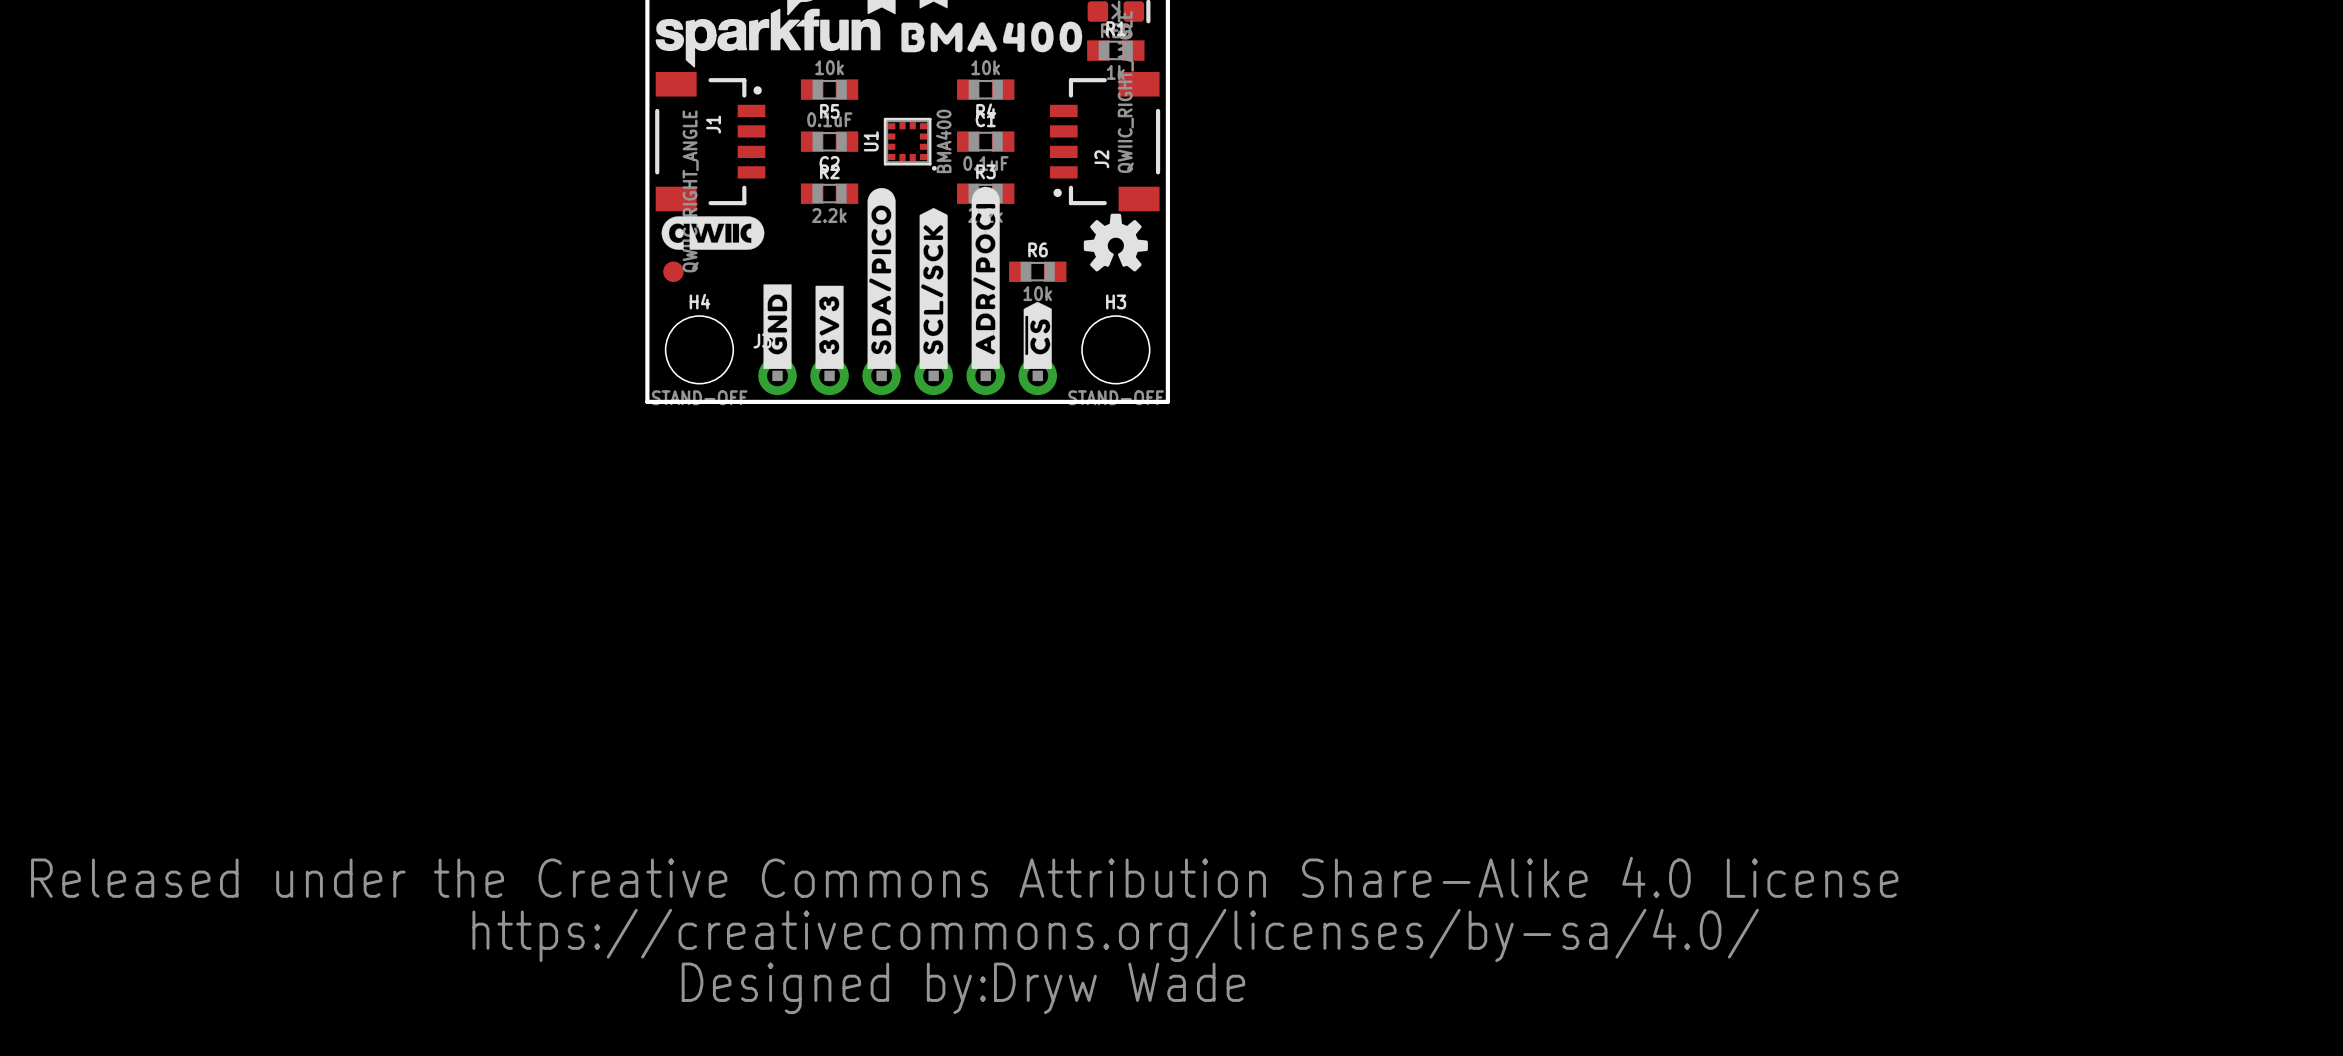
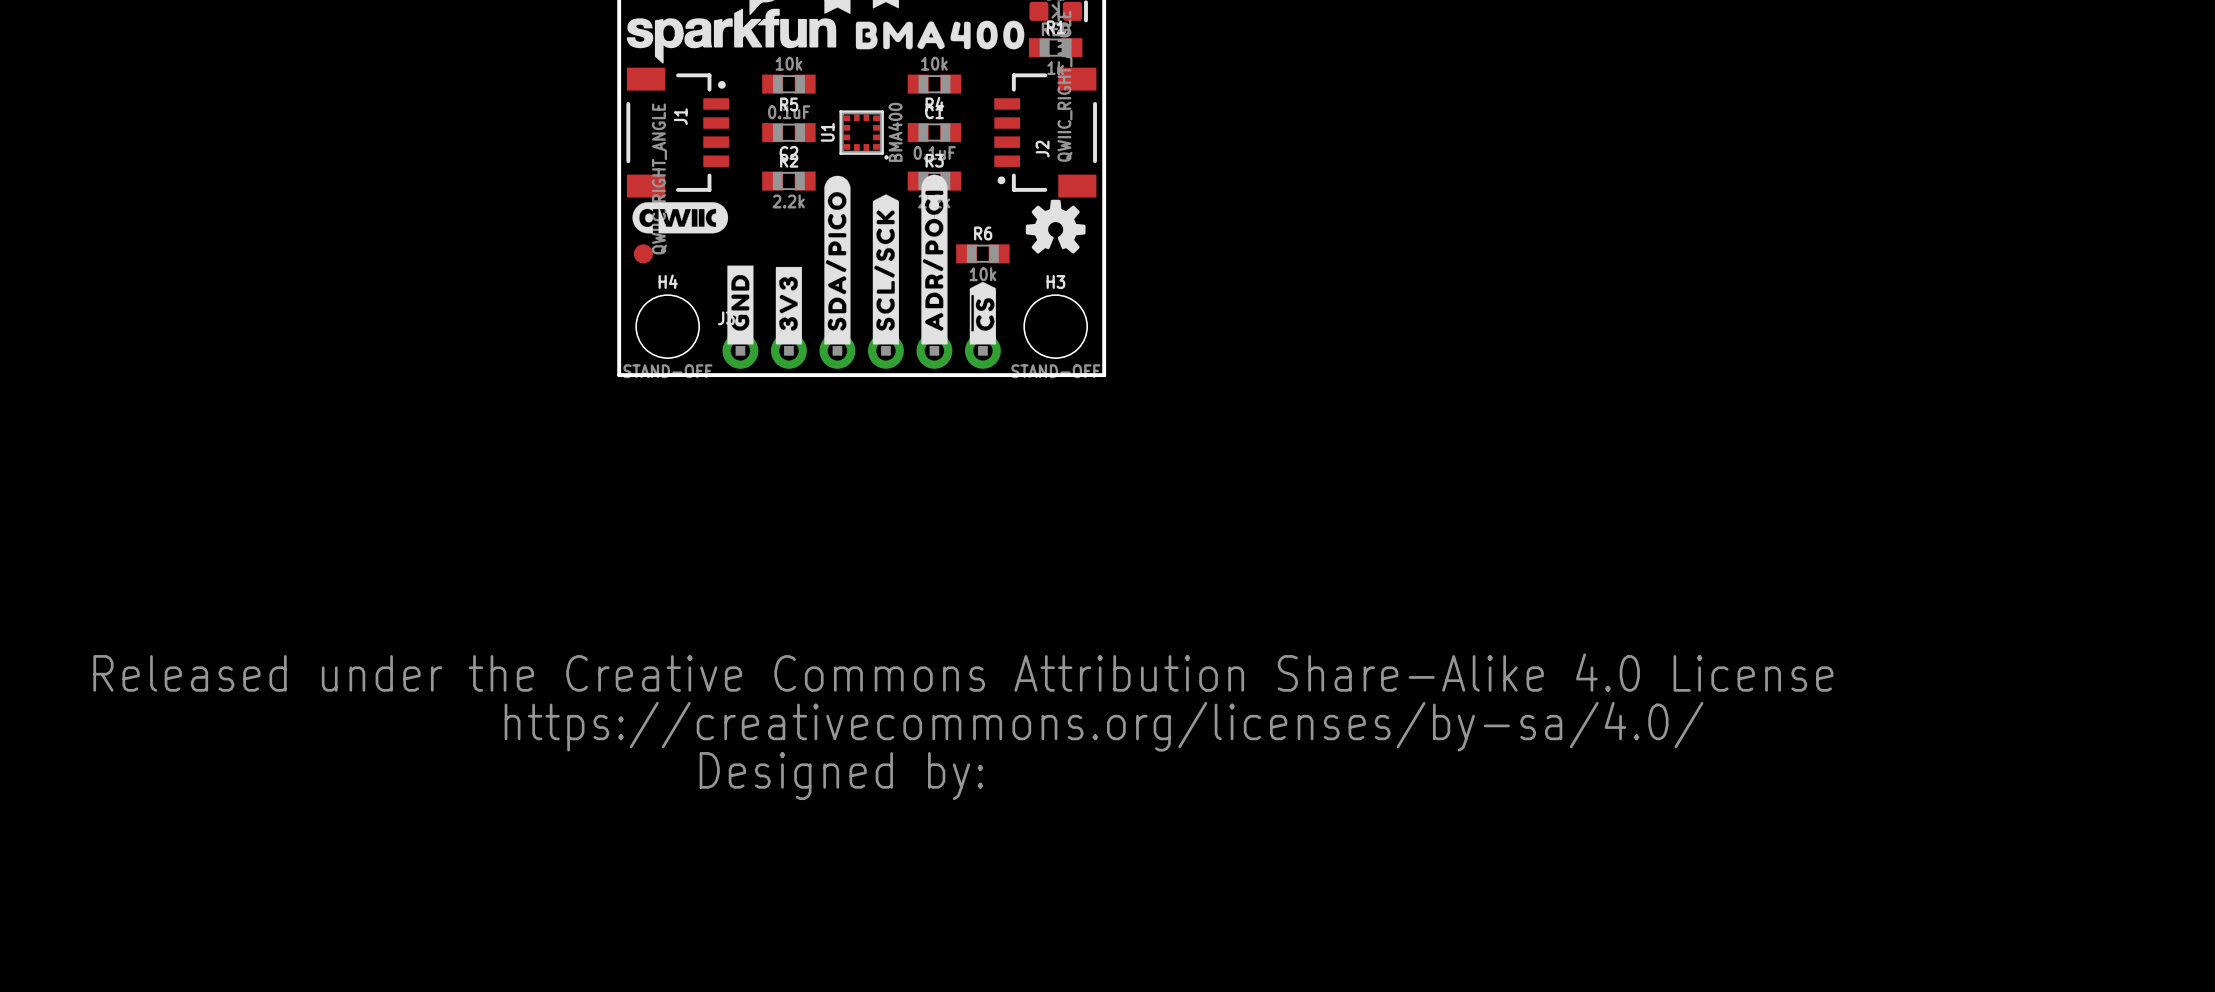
drawing position: (964, 935) -> (963, 726)
text: Dryw Wade (1119, 988) -> none

